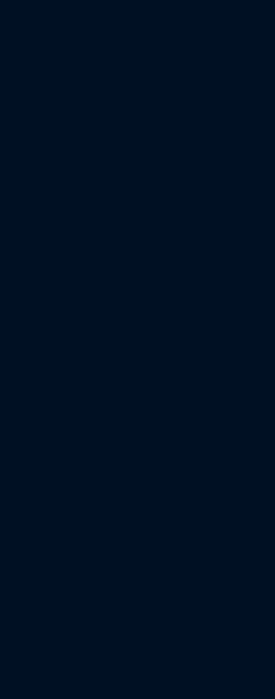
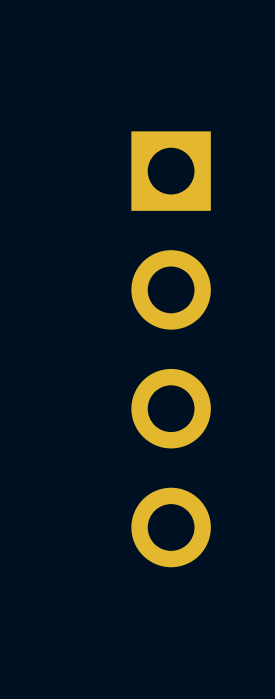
part: none -> (171, 349)

